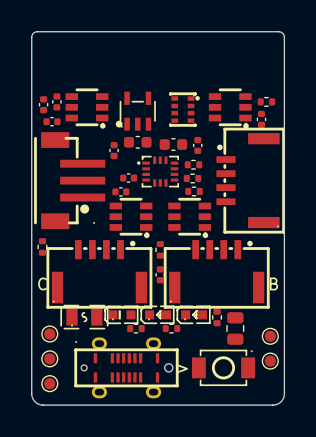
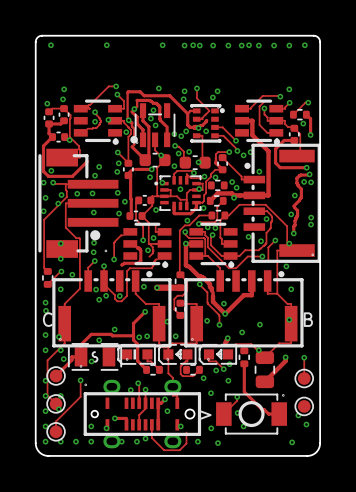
via: none -> (50, 45)
via: none -> (106, 45)
via: none -> (162, 45)
via: none -> (184, 45)
via: none -> (193, 45)
via: none -> (199, 45)
via: none -> (213, 45)
via: none -> (228, 45)
via: none -> (241, 45)
via: none -> (249, 45)
via: none -> (258, 45)
via: none -> (274, 45)
via: none -> (289, 45)
via: none -> (304, 45)
track: none -> (116, 86) (108, 86) (88, 105) (89, 108) (80, 108)
via: none -> (116, 86)
via: none -> (158, 88)
track: none -> (196, 88) (196, 98) (209, 110) (202, 119) (196, 119)
via: none -> (196, 88)
via: none -> (64, 89)
via: none -> (289, 89)
via: none -> (184, 91)
via: none -> (217, 91)
track: none -> (117, 94) (123, 101) (123, 108) (115, 108)
via: none -> (117, 94)
track: none -> (280, 96) (262, 95) (250, 108) (242, 108)
via: none -> (280, 96)
via: none -> (212, 97)
via: none -> (63, 99)
via: none -> (183, 99)
track: none -> (148, 100) (137, 100) (137, 106) (131, 111) (137, 117) (137, 123) (143, 129) (143, 139)
track: none -> (150, 100) (159, 105) (159, 119) (165, 125)
track: none -> (264, 101) (259, 106) (259, 125) (267, 132) (276, 132)
track: none -> (289, 102) (285, 108) (276, 108)
via: none -> (289, 102)
track: none -> (308, 102) (305, 102) (293, 114)
via: none -> (308, 102)
via: none -> (47, 103)
via: none -> (134, 109)
track: none -> (264, 108) (267, 120) (285, 120) (288, 127) (293, 127) (300, 134) (300, 152) (297, 156)
via: none -> (264, 108)
track: none -> (143, 110) (143, 120) (148, 126) (148, 156) (145, 160)
via: none -> (153, 110)
track: none -> (196, 110) (190, 110) (187, 113)
track: none -> (49, 111) (52, 108) (64, 108) (70, 115) (69, 137) (79, 146) (79, 157) (62, 157)
via: none -> (95, 112)
track: none -> (96, 114) (100, 120) (99, 124) (96, 128) (87, 128)
track: none -> (187, 113) (187, 124) (190, 127) (196, 127)
track: none -> (187, 113) (169, 95) (144, 95) (140, 91) (127, 92) (127, 119) (132, 122) (134, 128) (134, 144) (132, 146) (145, 160)
track: none -> (306, 114) (310, 118) (310, 134)
via: none -> (150, 118)
via: none -> (108, 119)
via: none -> (128, 120)
track: none -> (64, 120) (60, 123) (49, 123) (49, 133) (52, 137) (43, 146) (43, 171) (48, 176) (72, 176) (86, 160)
track: none -> (115, 120) (123, 120) (131, 130) (128, 136) (128, 163)
track: none -> (206, 120) (200, 125)
track: none -> (242, 120) (252, 120) (252, 135) (268, 151) (268, 195) (234, 195)
via: none -> (95, 121)
via: none -> (303, 123)
via: none -> (155, 125)
track: none -> (167, 126) (167, 139)
via: none -> (198, 128)
track: none -> (214, 127) (222, 127) (236, 140)
via: none -> (186, 131)
via: none -> (206, 131)
via: none -> (126, 132)
via: none -> (174, 134)
via: none -> (310, 134)
track: none -> (196, 135) (202, 135) (202, 160) (205, 162)
track: none -> (214, 135) (223, 135) (237, 150)
via: none -> (181, 136)
via: none -> (69, 140)
track: none -> (155, 139) (155, 150) (164, 160) (157, 167) (157, 196)
track: none -> (294, 140) (284, 140) (275, 148) (275, 162) (280, 167) (306, 167)
via: none -> (236, 140)
via: none -> (175, 145)
track: none -> (174, 146) (178, 146) (183, 151) (185, 162)
via: none -> (189, 151)
via: none -> (237, 150)
track: none -> (117, 152) (128, 163)
via: none -> (117, 152)
track: none -> (229, 152) (218, 152) (215, 154) (215, 163) (222, 169) (215, 169) (206, 181) (206, 193) (202, 202) (196, 202) (196, 207) (190, 213) (174, 213) (174, 205)
via: none -> (229, 152)
via: none -> (250, 152)
via: none -> (178, 153)
via: none -> (161, 155)
via: none -> (243, 155)
track: none -> (222, 157) (241, 176) (241, 179) (254, 179)
via: none -> (198, 162)
via: none -> (118, 163)
via: none -> (174, 166)
via: none -> (99, 166)
via: none -> (306, 167)
track: none -> (151, 169) (132, 169) (128, 173) (129, 177)
via: none -> (151, 169)
via: none -> (51, 170)
via: none -> (117, 171)
via: none -> (259, 171)
track: none -> (193, 172) (191, 170) (177, 170) (174, 174) (174, 180)
via: none -> (193, 172)
track: none -> (309, 174) (300, 175) (296, 178) (296, 183) (301, 189) (301, 197) (293, 206)
via: none -> (309, 174)
via: none -> (95, 175)
track: none -> (204, 176) (190, 178) (186, 174) (186, 180)
via: none -> (204, 176)
via: none -> (150, 177)
via: none -> (215, 177)
track: none -> (130, 178) (131, 211)
via: none -> (232, 182)
via: none -> (304, 181)
via: none -> (43, 182)
track: none -> (53, 182) (64, 183)
via: none -> (53, 182)
via: none -> (162, 182)
via: none -> (311, 182)
track: none -> (93, 184) (65, 184) (66, 197) (44, 219) (44, 267) (47, 271)
track: none -> (196, 183) (202, 183) (202, 189) (190, 189) (186, 193) (186, 205)
via: none -> (236, 187)
via: none -> (199, 189)
track: none -> (164, 189) (170, 189) (170, 196)
via: none -> (180, 189)
via: none -> (92, 193)
via: none -> (117, 192)
via: none -> (77, 193)
via: none -> (61, 195)
track: none -> (234, 195) (232, 193) (217, 193) (210, 200)
via: none -> (294, 195)
via: none -> (45, 197)
via: none -> (234, 197)
track: none -> (186, 199) (180, 199) (177, 196) (152, 196) (152, 205) (142, 216) (148, 222) (148, 243)
track: none -> (138, 200) (136, 203) (136, 219) (143, 226) (143, 240)
track: none -> (223, 200) (217, 206) (217, 220) (215, 222) (200, 222) (198, 223)
via: none -> (124, 201)
via: none -> (58, 203)
track: none -> (93, 203) (65, 203) (65, 227) (76, 238) (79, 238) (79, 288) (64, 303) (64, 343) (47, 360) (47, 395) (56, 403)
via: none -> (203, 208)
track: none -> (294, 207) (297, 210) (297, 215) (293, 230)
via: none -> (156, 209)
via: none -> (43, 211)
track: none -> (254, 211) (267, 211) (271, 215)
via: none -> (93, 212)
via: none -> (119, 213)
via: none -> (291, 214)
track: none -> (211, 215) (199, 215) (189, 225) (184, 225) (179, 230) (179, 274) (187, 279) (187, 291) (182, 295) (177, 295) (174, 299) (174, 309) (180, 315)
track: none -> (271, 216) (270, 227) (266, 232) (266, 242) (259, 249)
via: none -> (311, 217)
via: none -> (266, 219)
via: none -> (187, 220)
via: none -> (198, 223)
track: none -> (155, 224) (155, 231) (164, 231)
via: none -> (311, 224)
via: none -> (207, 227)
via: none -> (215, 228)
track: none -> (185, 231) (189, 238) (205, 239) (205, 255)
via: none -> (185, 231)
track: none -> (196, 231) (205, 231) (207, 237) (207, 247) (228, 268) (236, 268) (247, 256) (262, 256)
via: none -> (293, 233)
track: none -> (212, 235) (210, 245) (221, 255) (239, 255) (245, 250) (259, 250)
via: none -> (212, 235)
track: none -> (123, 235) (114, 242) (114, 259)
via: none -> (248, 236)
via: none -> (153, 238)
via: none -> (143, 240)
track: none -> (275, 240) (268, 247) (268, 260)
via: none -> (275, 240)
via: none -> (261, 241)
via: none -> (94, 242)
via: none -> (60, 243)
track: none -> (148, 243) (164, 243)
track: none -> (148, 243) (152, 247) (152, 253) (149, 256)
via: none -> (185, 243)
track: none -> (196, 243) (185, 243) (186, 266)
track: none -> (230, 243) (221, 243) (220, 220) (224, 215) (228, 215) (239, 204) (265, 204) (287, 226) (287, 250)
via: none -> (289, 243)
track: none -> (136, 247) (140, 250) (140, 262) (121, 265)
via: none -> (147, 250)
track: none -> (153, 249) (153, 251)
track: none -> (297, 250) (277, 250) (277, 293)
via: none -> (93, 252)
track: none -> (196, 255) (207, 255) (220, 268) (220, 281)
via: none -> (262, 256)
via: none -> (60, 258)
via: none -> (114, 259)
track: none -> (157, 259) (152, 267)
track: none -> (94, 261) (88, 267) (88, 281)
via: none -> (94, 261)
track: none -> (104, 266) (104, 284) (115, 295) (117, 301) (121, 301) (126, 295) (126, 271) (129, 268) (152, 268)
via: none -> (104, 266)
track: none -> (189, 266) (209, 284) (211, 290)
via: none -> (286, 266)
track: none -> (60, 271) (47, 284)
via: none -> (61, 271)
via: none -> (72, 274)
track: none -> (135, 281) (135, 293) (145, 303) (159, 303) (159, 343) (163, 347) (168, 347)
track: none -> (251, 281) (251, 295) (243, 295) (225, 313) (213, 301) (213, 292)
track: none -> (267, 281) (267, 293) (277, 293)
track: none -> (199, 284) (207, 292) (208, 303) (219, 315) (219, 324)
via: none -> (199, 284)
via: none -> (143, 286)
track: none -> (157, 287) (180, 287)
via: none -> (157, 287)
via: none -> (60, 289)
via: none -> (96, 289)
via: none -> (291, 289)
track: none -> (277, 293) (287, 303) (291, 303) (291, 343) (279, 343) (264, 357) (251, 344) (235, 344)
via: none -> (106, 295)
via: none -> (119, 296)
via: none -> (99, 299)
via: none -> (45, 302)
track: none -> (180, 303) (196, 303) (196, 343) (172, 343) (168, 347)
via: none -> (223, 303)
via: none -> (45, 310)
track: none -> (145, 311) (133, 323) (133, 340) (137, 344) (137, 360) (146, 369)
via: none -> (145, 311)
via: none -> (225, 313)
via: none -> (289, 319)
via: none -> (167, 321)
via: none -> (207, 320)
via: none -> (219, 324)
via: none -> (259, 324)
via: none -> (114, 329)
via: none -> (242, 332)
via: none -> (45, 335)
track: none -> (133, 335) (91, 334) (81, 344) (81, 356) (71, 356) (71, 360) (56, 375)
via: none -> (147, 336)
via: none -> (175, 336)
via: none -> (58, 336)
via: none -> (139, 337)
track: none -> (227, 338) (225, 342)
via: none -> (227, 338)
via: none -> (99, 340)
track: none -> (168, 347) (168, 373) (172, 377) (172, 395) (177, 395) (177, 403)
via: none -> (45, 350)
via: none -> (60, 350)
via: none -> (258, 350)
track: none -> (147, 354) (147, 361) (151, 361) (159, 369)
track: none -> (187, 354) (187, 361) (180, 366) (180, 374) (182, 376) (193, 376) (199, 369)
track: none -> (209, 354) (209, 361) (216, 361) (223, 369)
track: none -> (285, 357) (285, 361) (264, 381)
via: none -> (285, 357)
track: none -> (304, 357) (304, 378)
via: none -> (304, 357)
via: none -> (63, 359)
via: none -> (91, 361)
via: none -> (229, 364)
track: none -> (244, 363) (244, 391) (268, 414) (279, 414)
via: none -> (223, 369)
via: none -> (216, 370)
via: none -> (203, 378)
track: none -> (80, 380) (80, 396) (56, 421) (56, 431)
via: none -> (80, 380)
via: none -> (45, 380)
via: none -> (228, 380)
track: none -> (138, 383) (139, 403)
via: none -> (138, 383)
via: none -> (130, 390)
track: none -> (145, 389) (145, 408) (139, 415) (139, 424)
via: none -> (145, 389)
via: none -> (211, 393)
via: none -> (45, 395)
via: none -> (60, 395)
track: none -> (237, 397) (237, 400) (223, 414)
via: none -> (237, 397)
track: none -> (165, 399) (158, 403) (158, 424)
via: none -> (165, 399)
via: none -> (58, 409)
via: none -> (45, 411)
via: none -> (167, 411)
via: none -> (237, 413)
via: none -> (298, 415)
track: none -> (114, 418) (126, 418)
via: none -> (114, 418)
track: none -> (151, 424) (151, 437) (164, 450) (179, 450) (186, 443) (186, 432)
via: none -> (306, 424)
via: none -> (45, 426)
via: none -> (91, 426)
via: none -> (180, 426)
via: none -> (243, 426)
via: none -> (106, 428)
via: none -> (211, 428)
via: none -> (145, 438)
via: none -> (45, 441)
via: none -> (60, 441)
via: none -> (76, 441)
via: none -> (91, 441)
via: none -> (121, 441)
via: none -> (136, 441)
via: none -> (197, 441)
via: none -> (218, 443)
via: none -> (292, 442)

